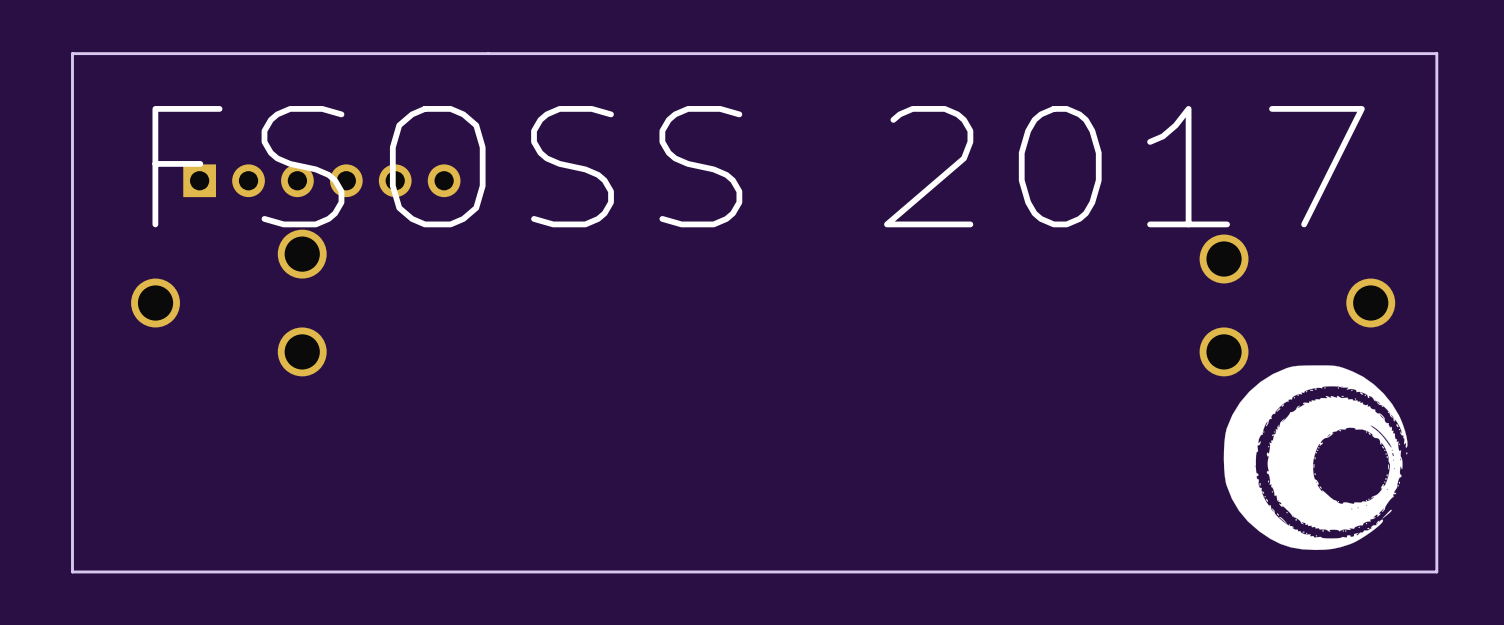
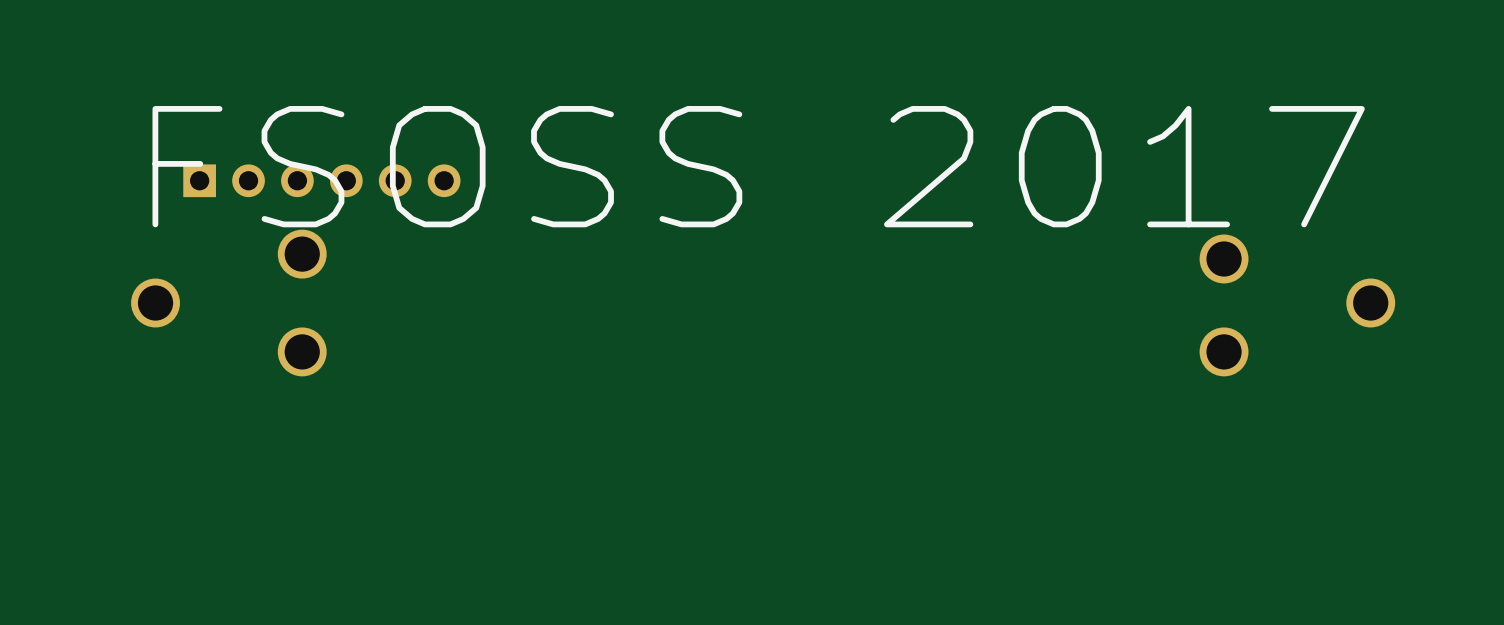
board edge: (1436, 53) (72, 53) (72, 571) (1436, 571) (1436, 53) -> none
drawing: [1223, 365, 1408, 551] -> none

